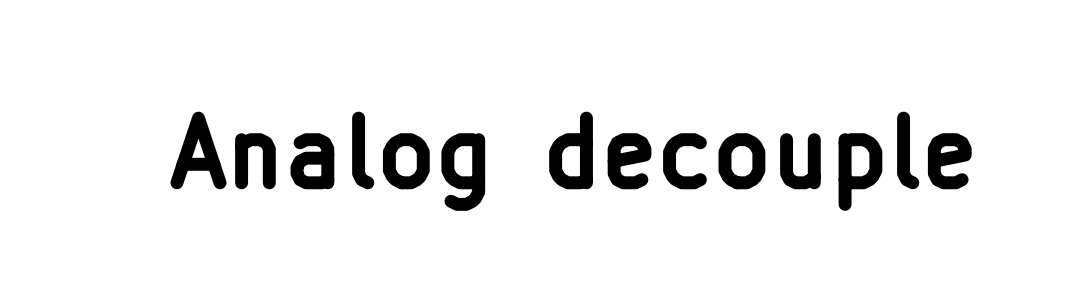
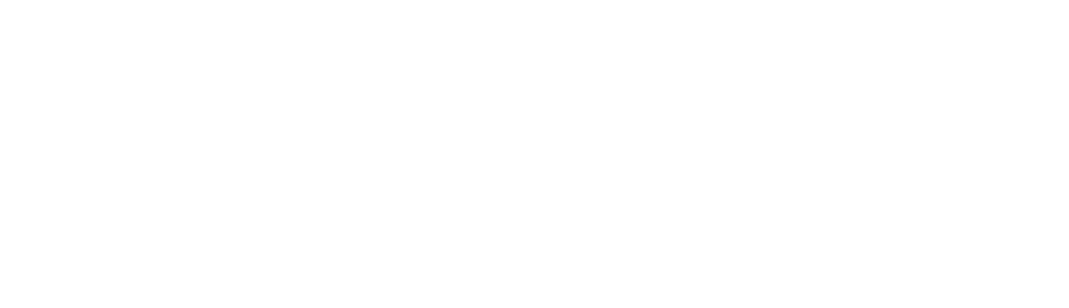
text: Analog decouple (571, 161) -> none

